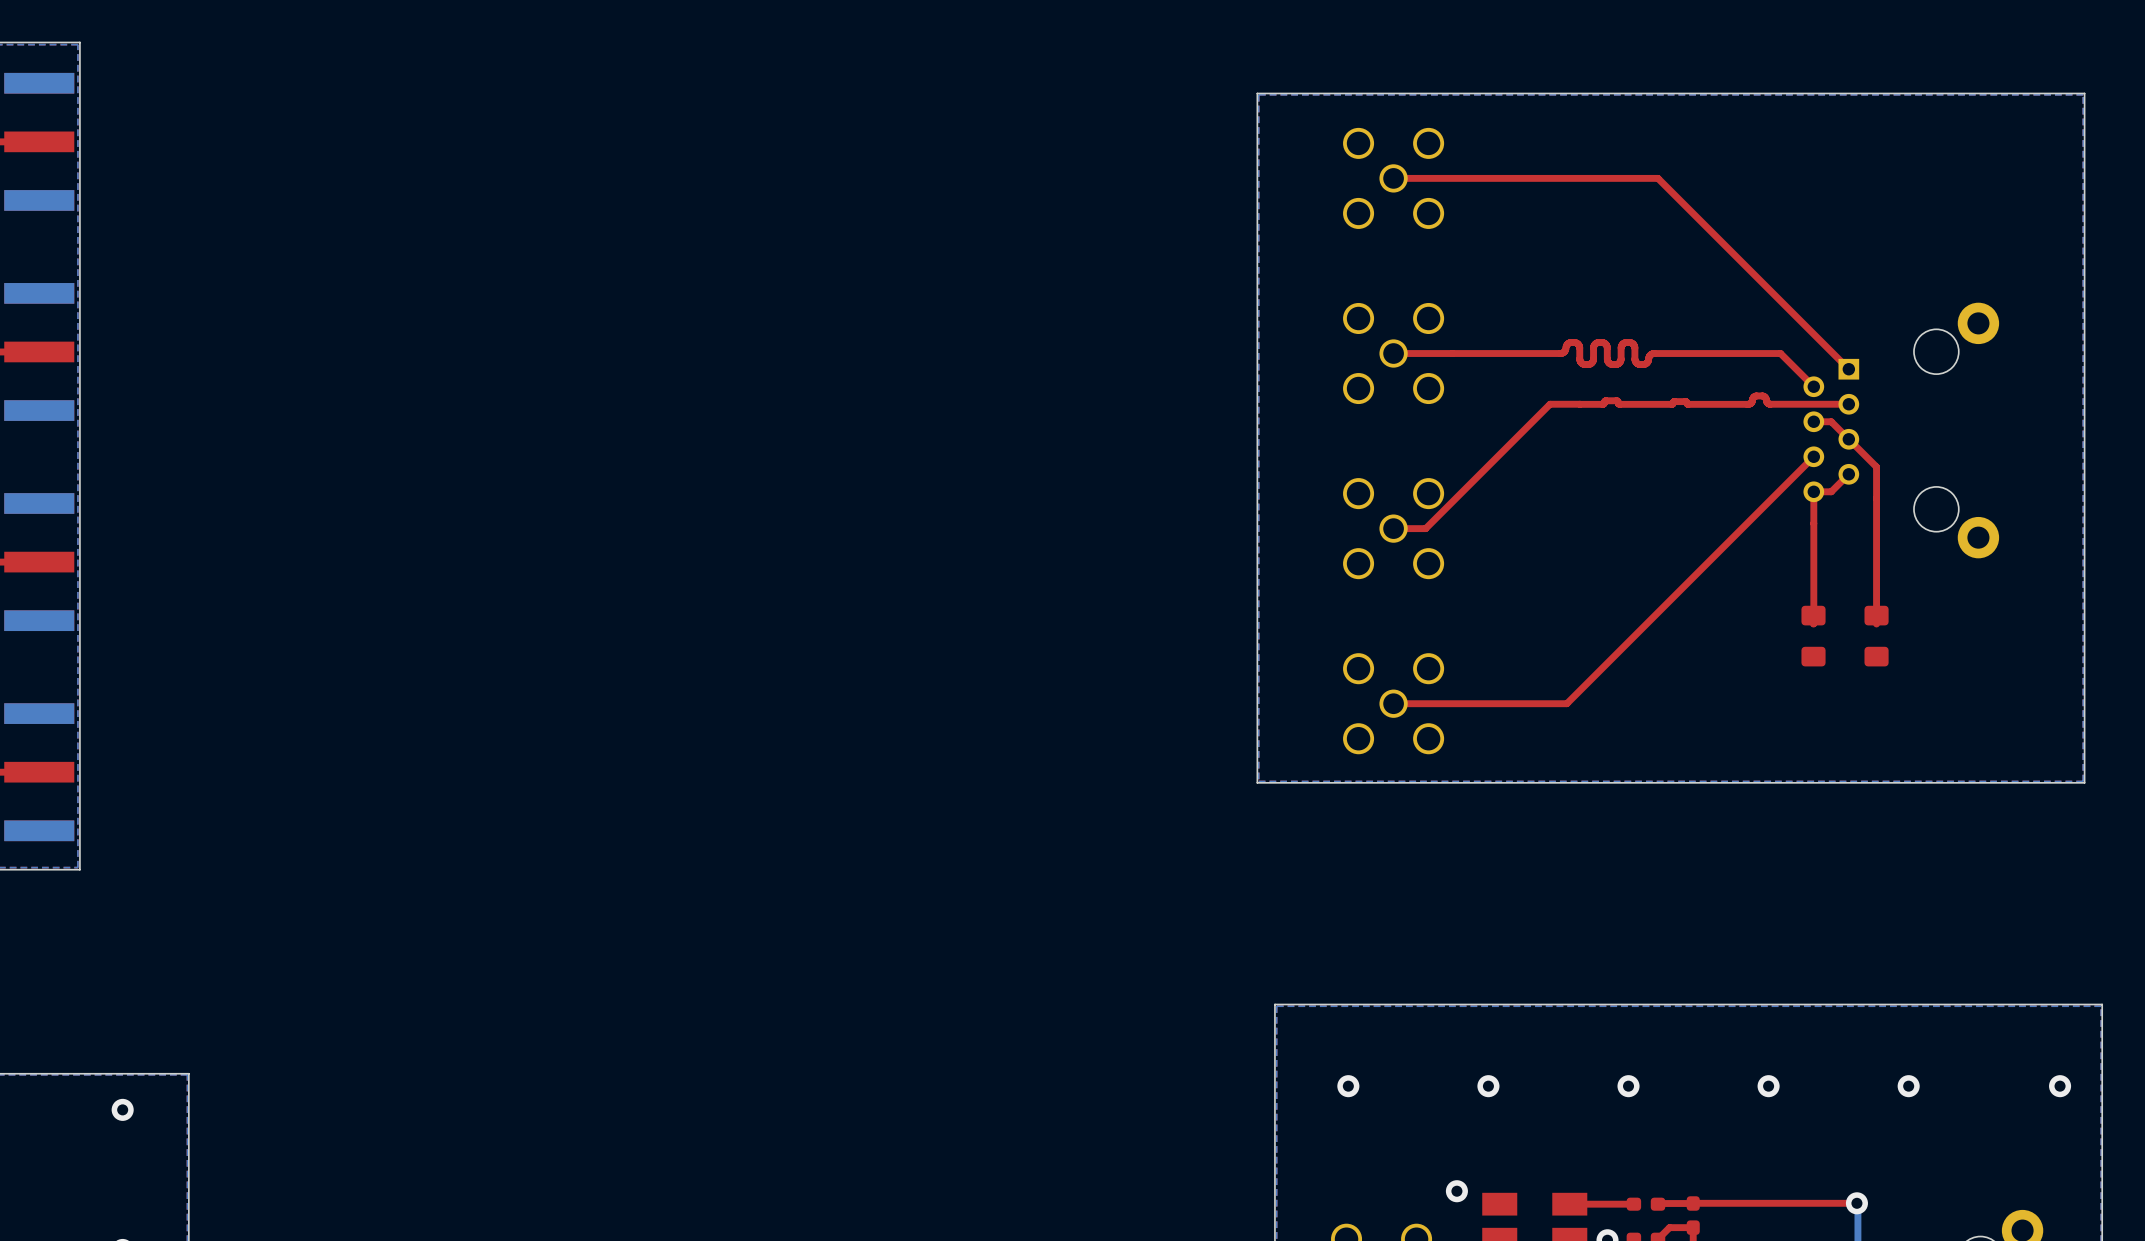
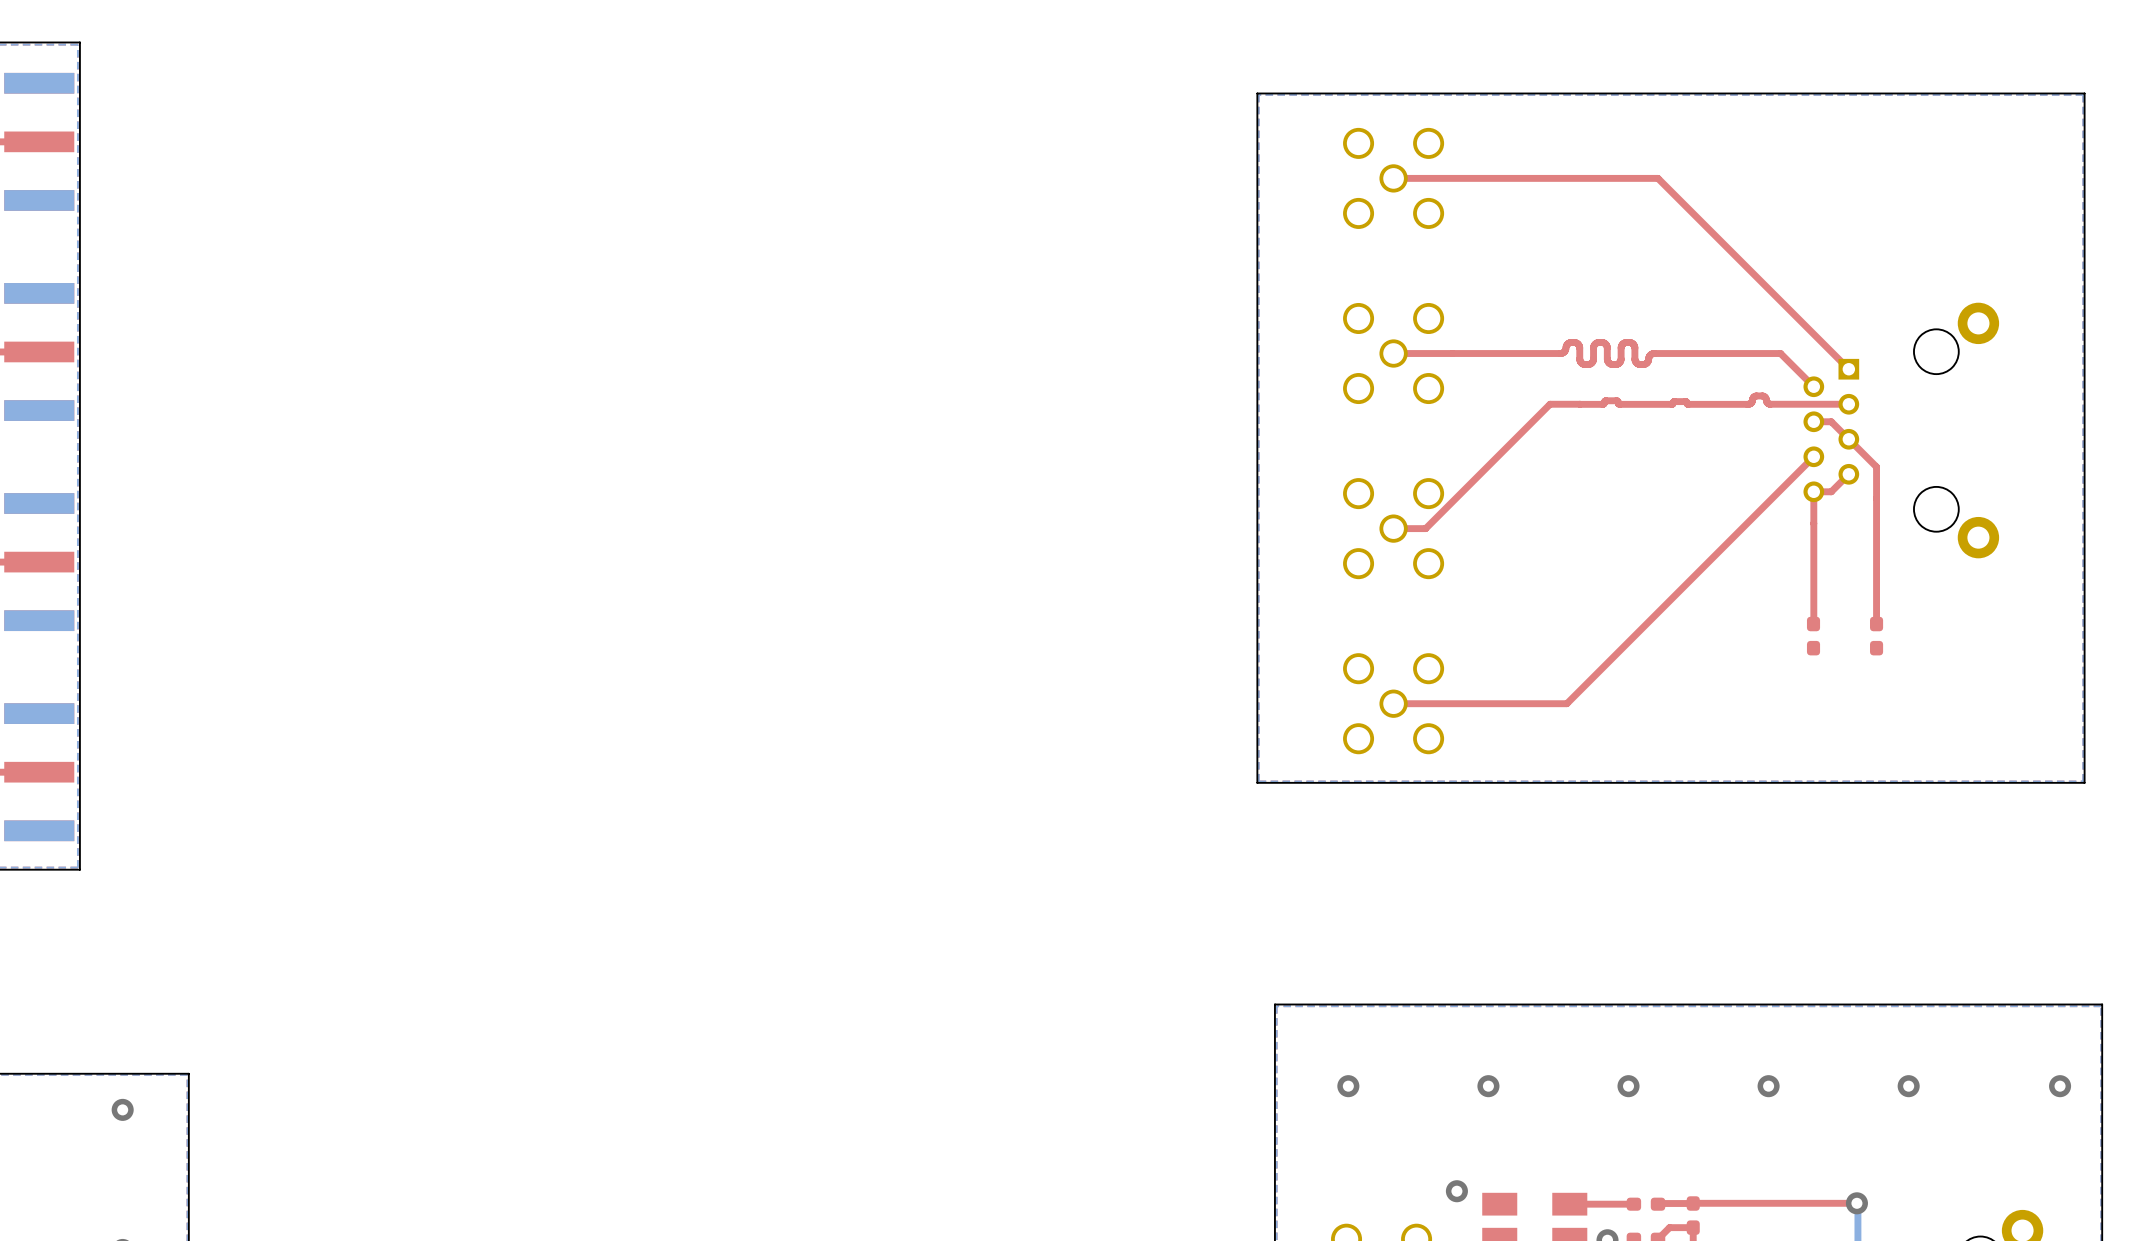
part footprint: [1801, 605, 1826, 667] -> [1806, 616, 1821, 656]
part footprint: [1864, 605, 1889, 667] -> [1870, 616, 1884, 656]

